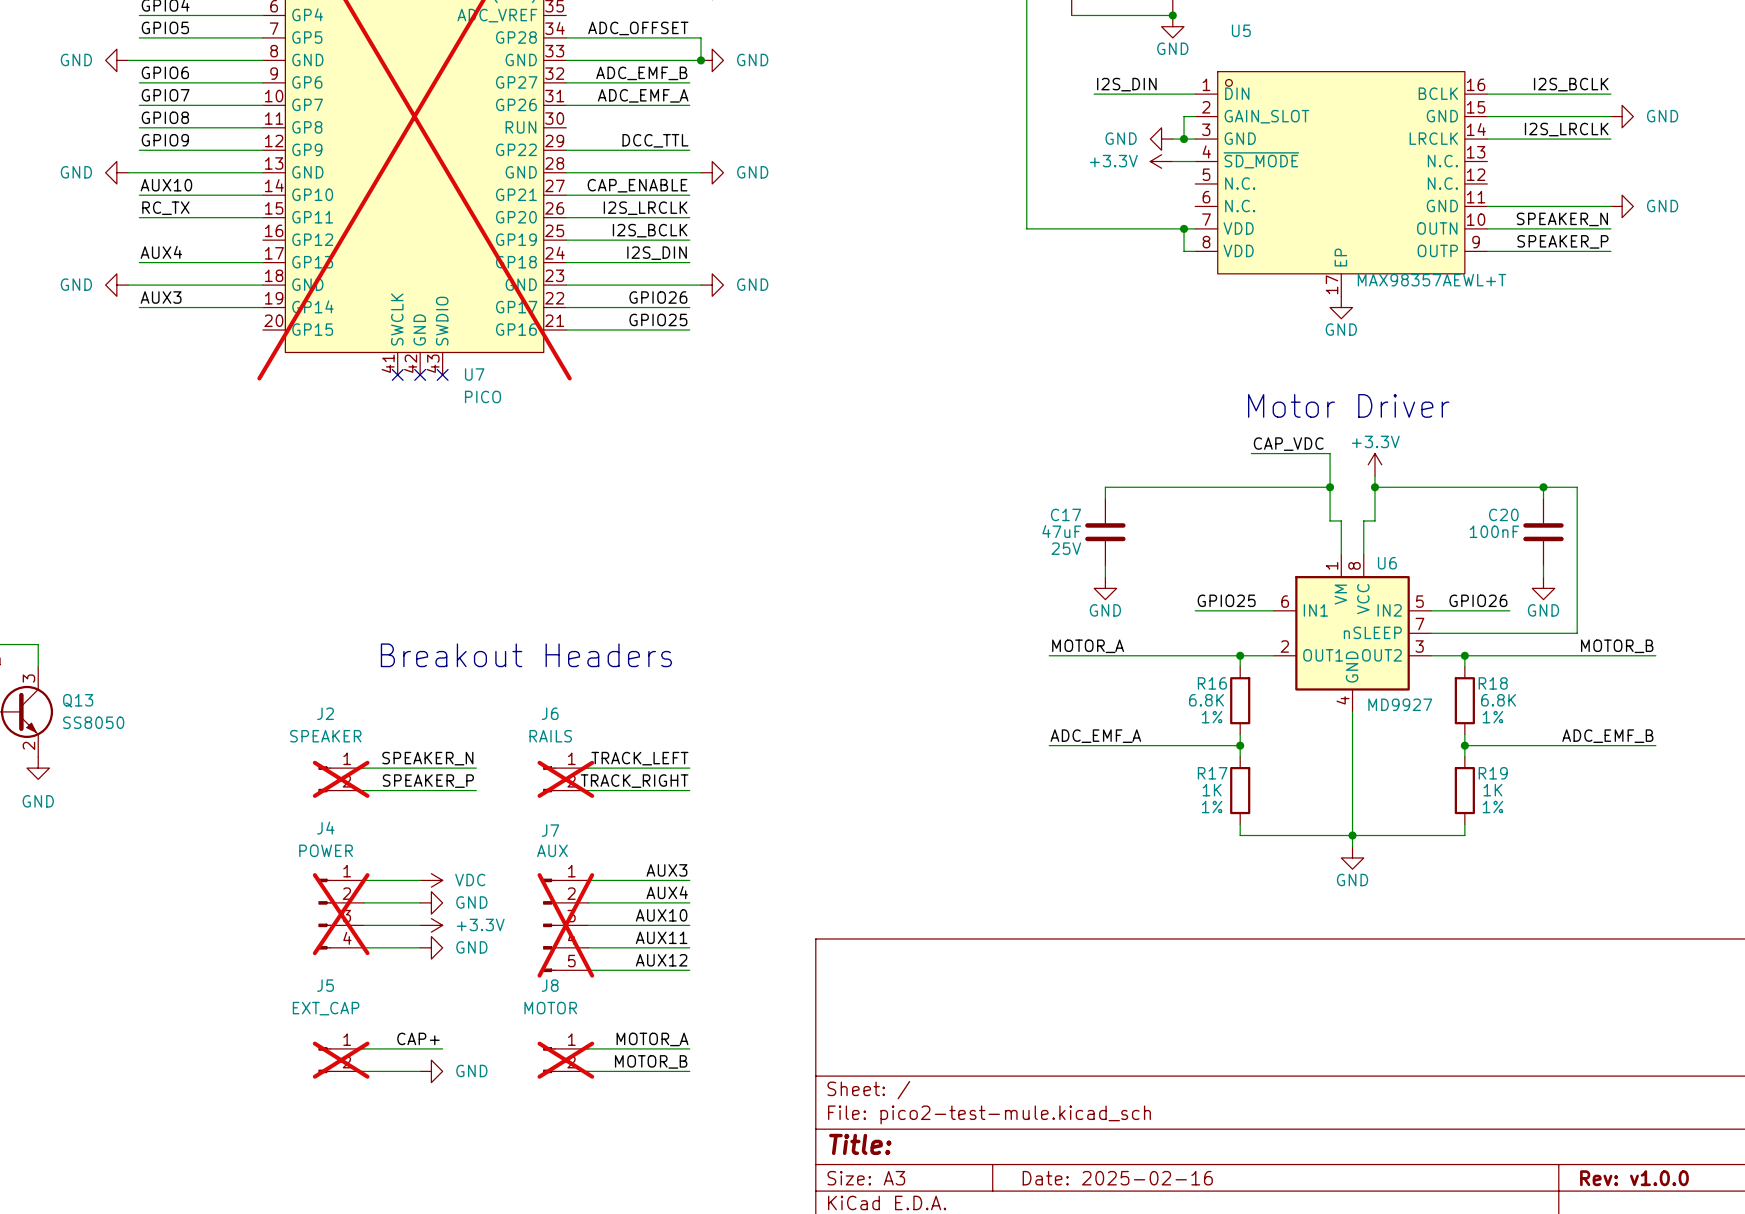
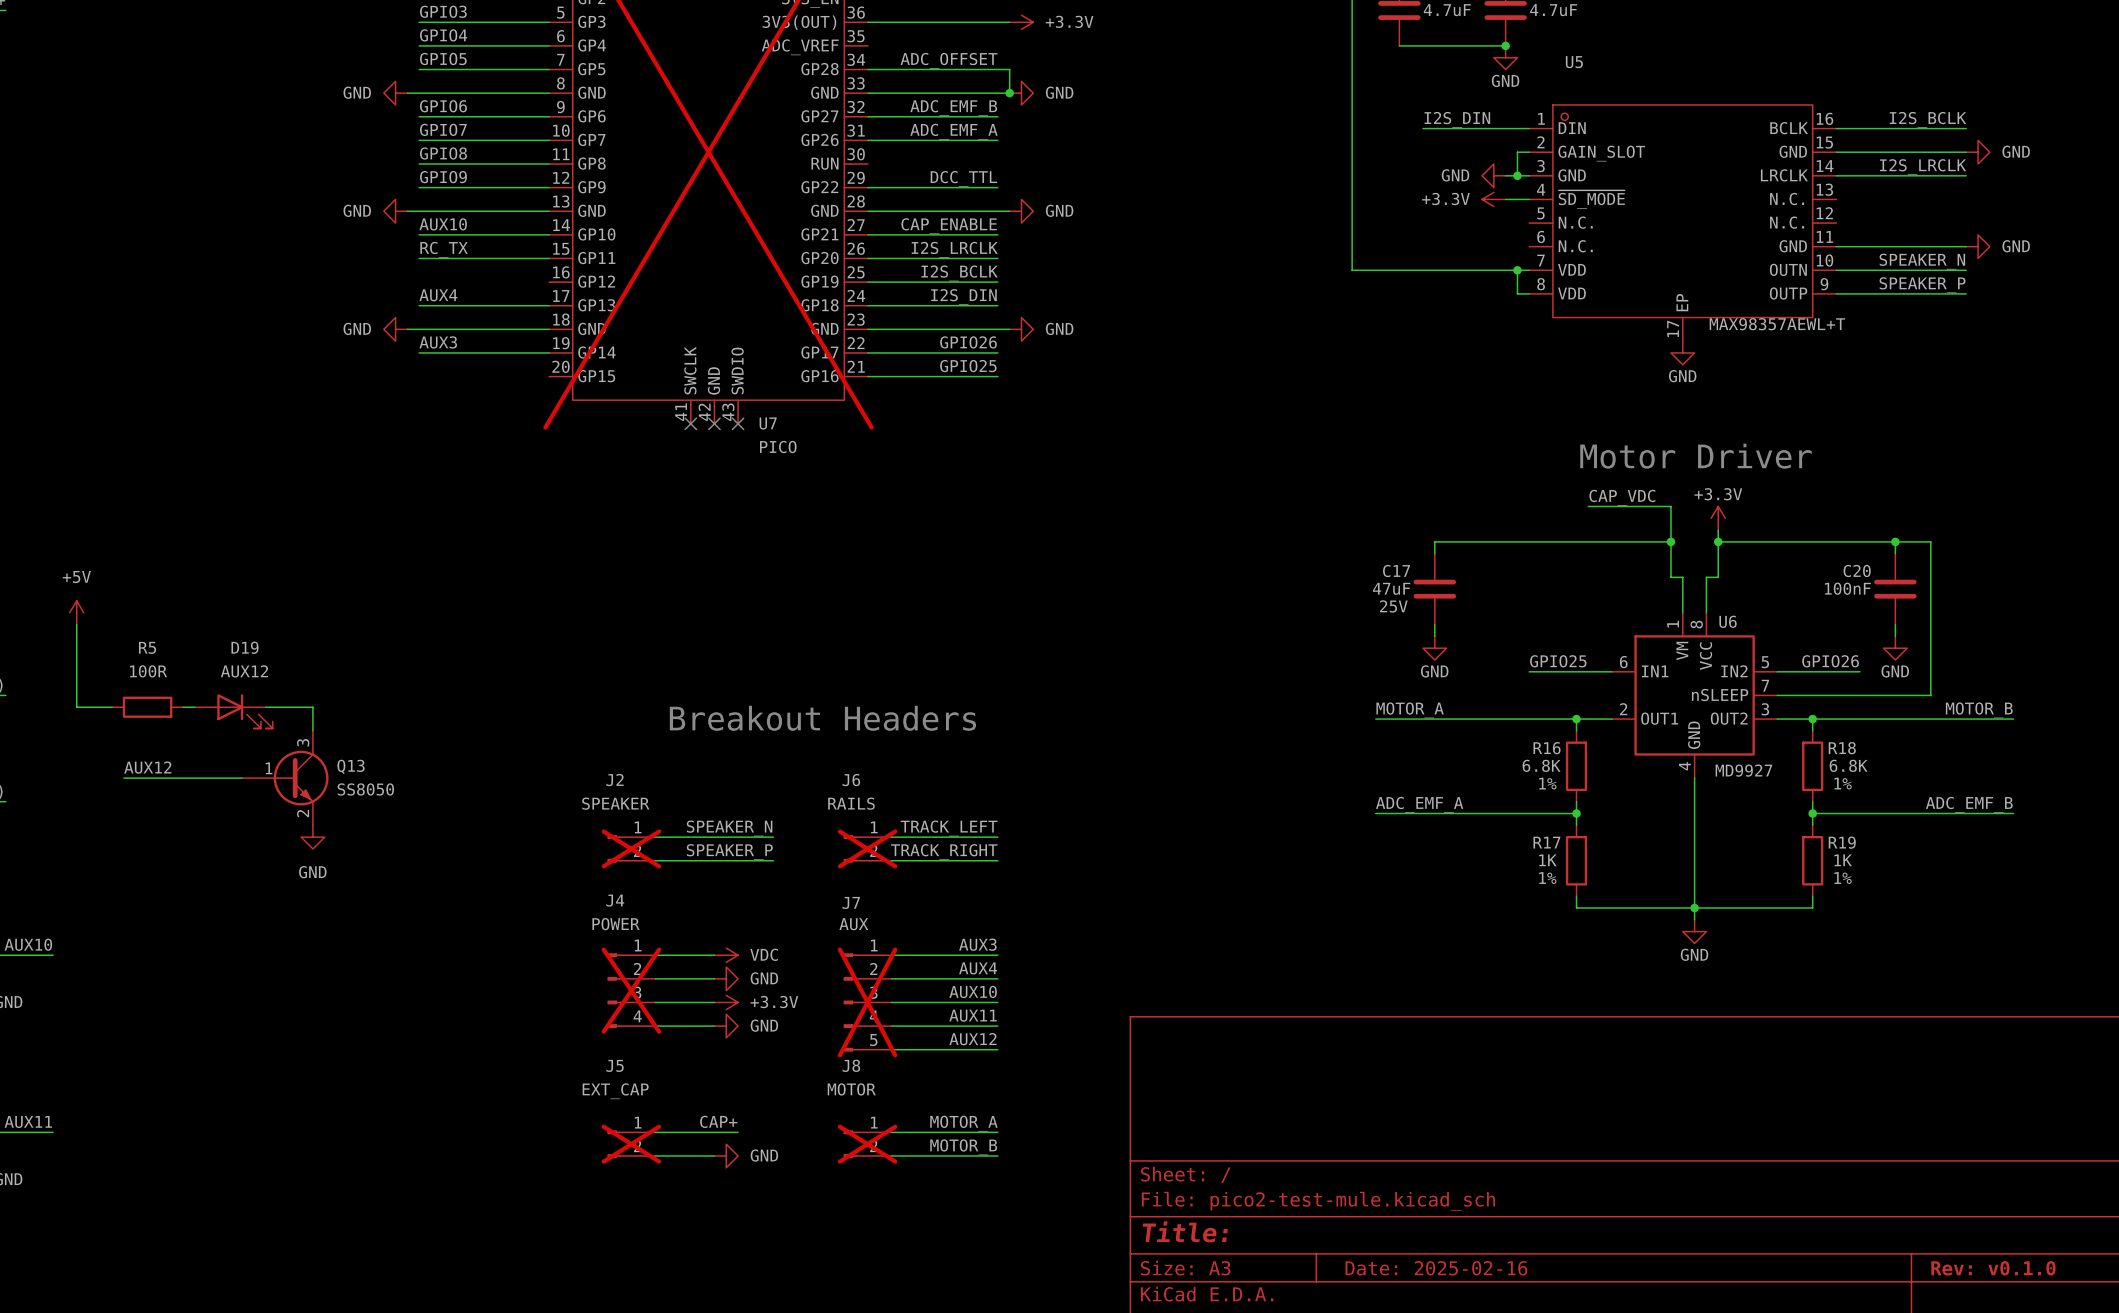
title block: Rev: v1.0.0 (1634, 1178) -> Rev: v0.1.0 (1993, 1268)

